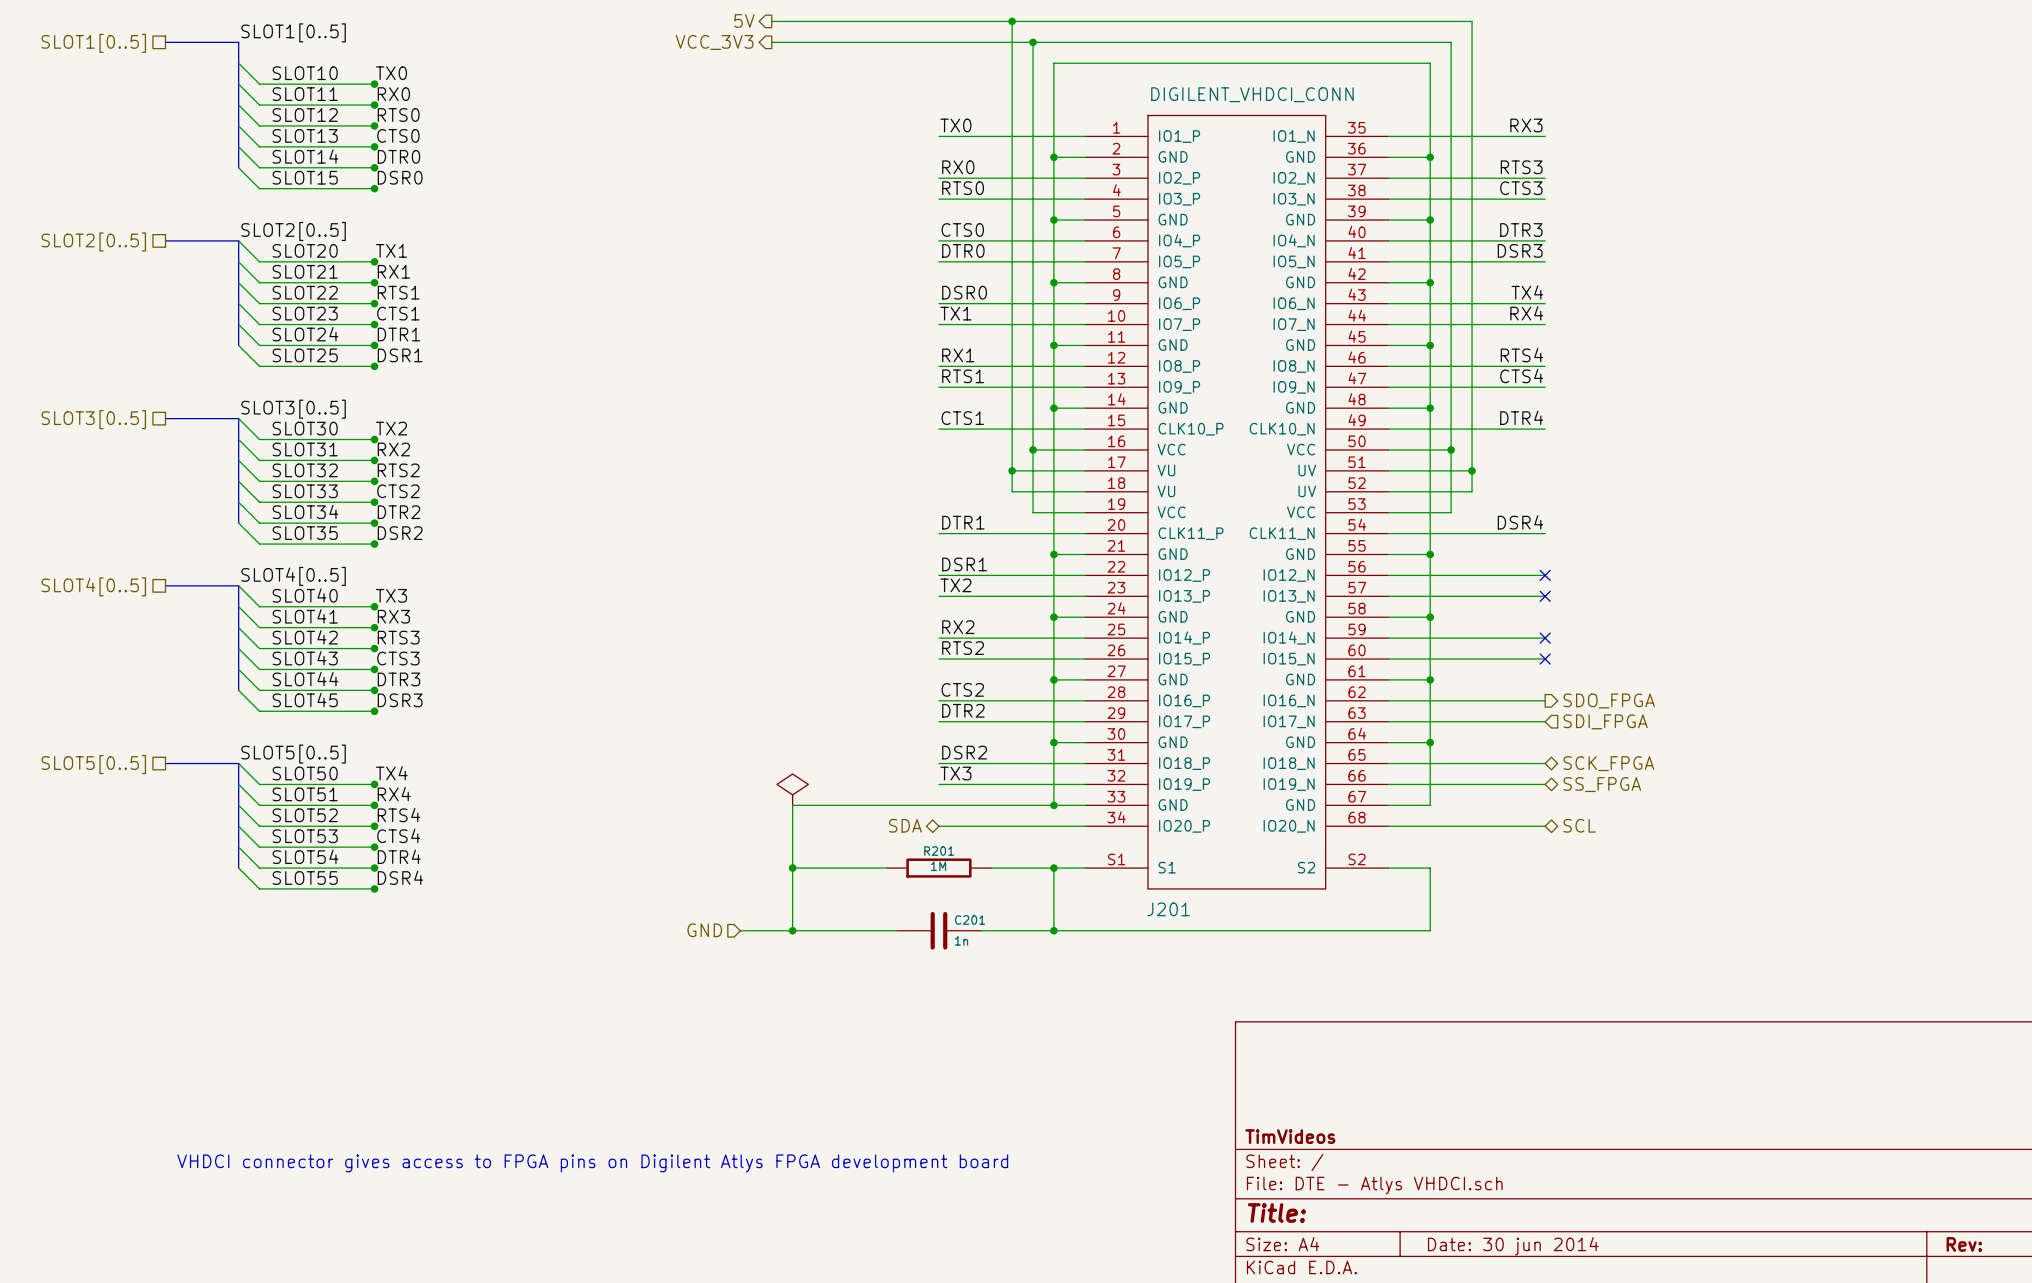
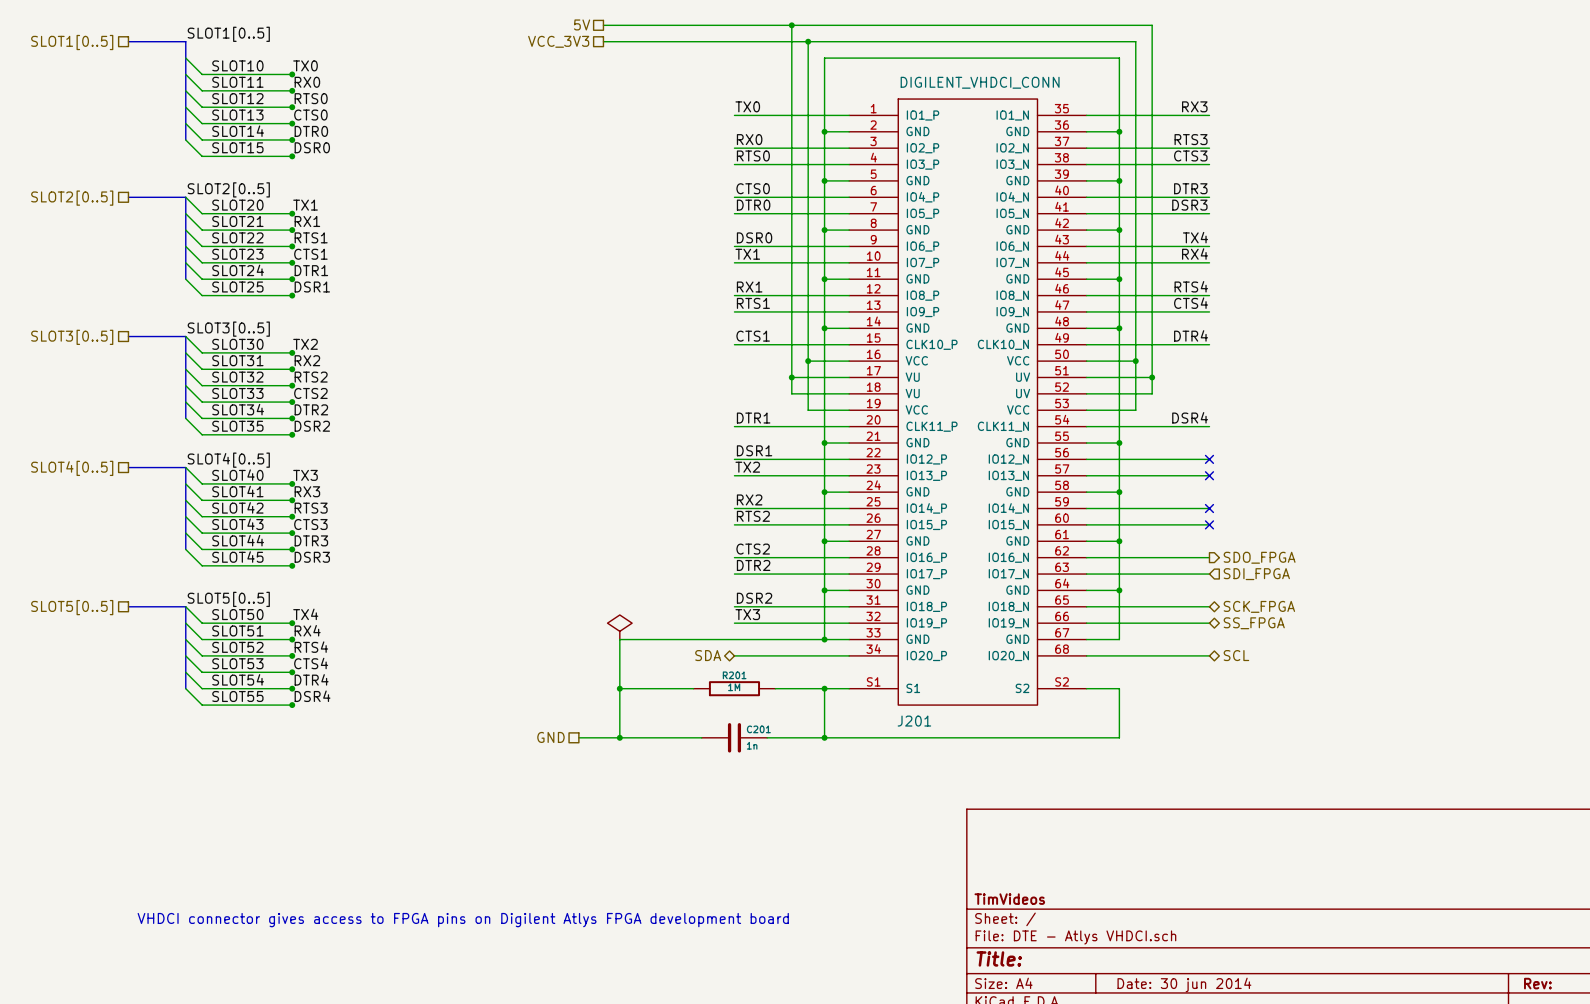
hierarchical label shape: output (744, 20) -> passive (582, 24)
hierarchical label shape: output (714, 42) -> passive (558, 41)
hierarchical label shape: input (704, 930) -> passive (550, 737)

